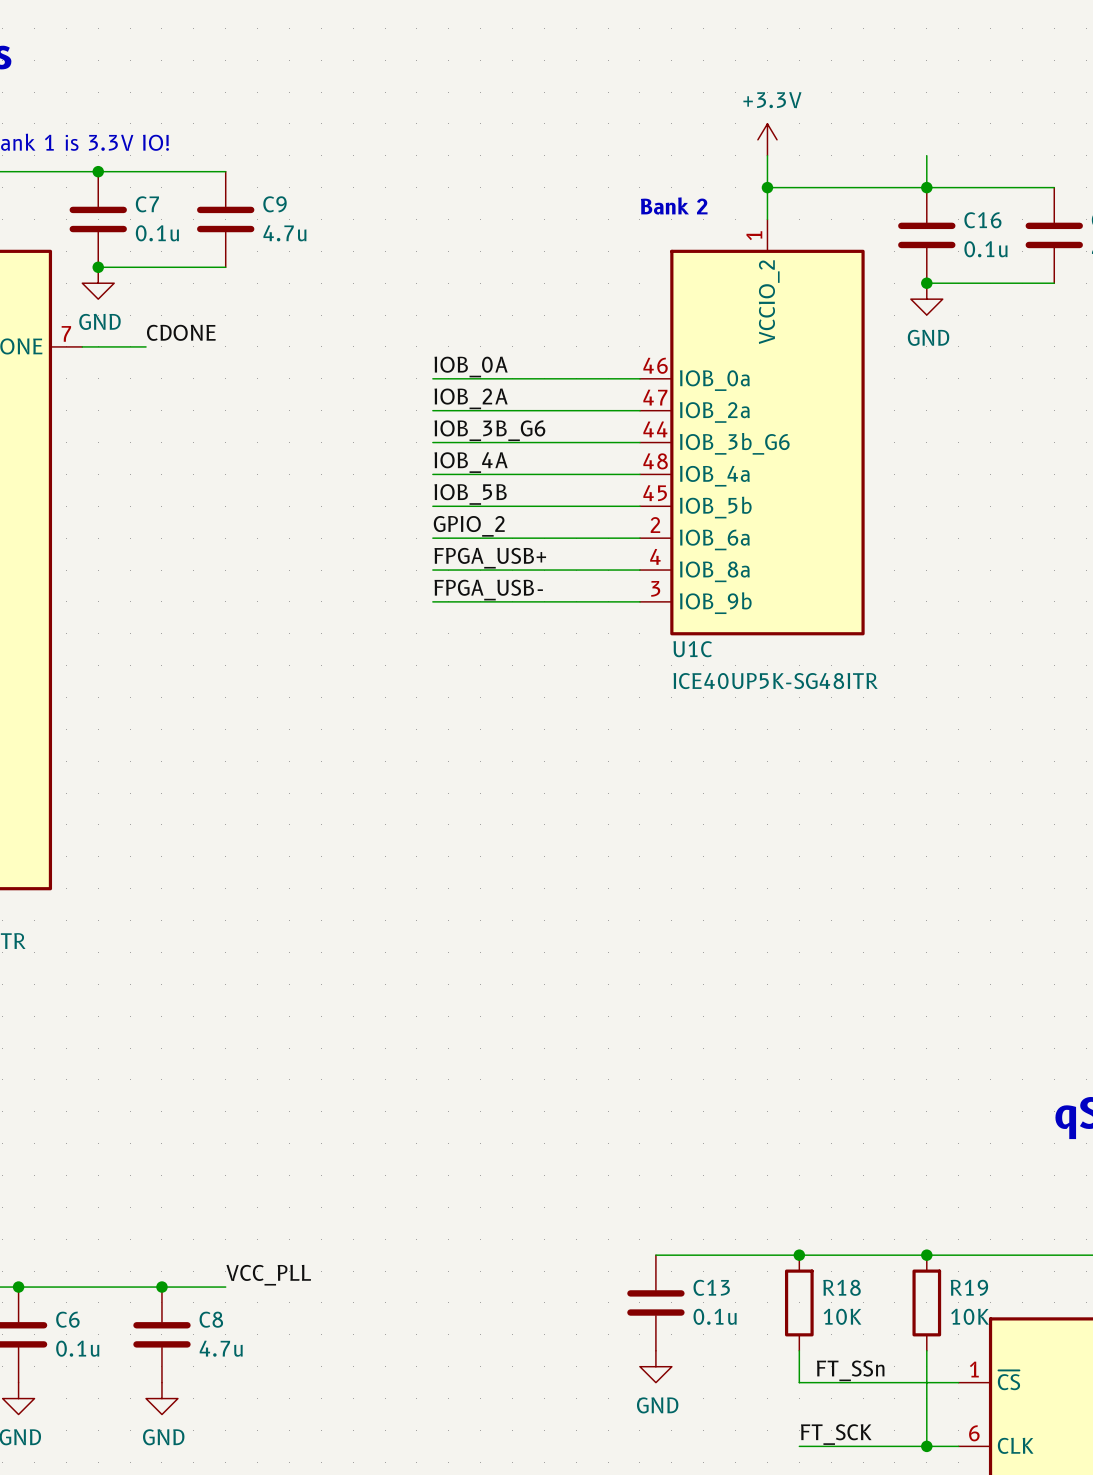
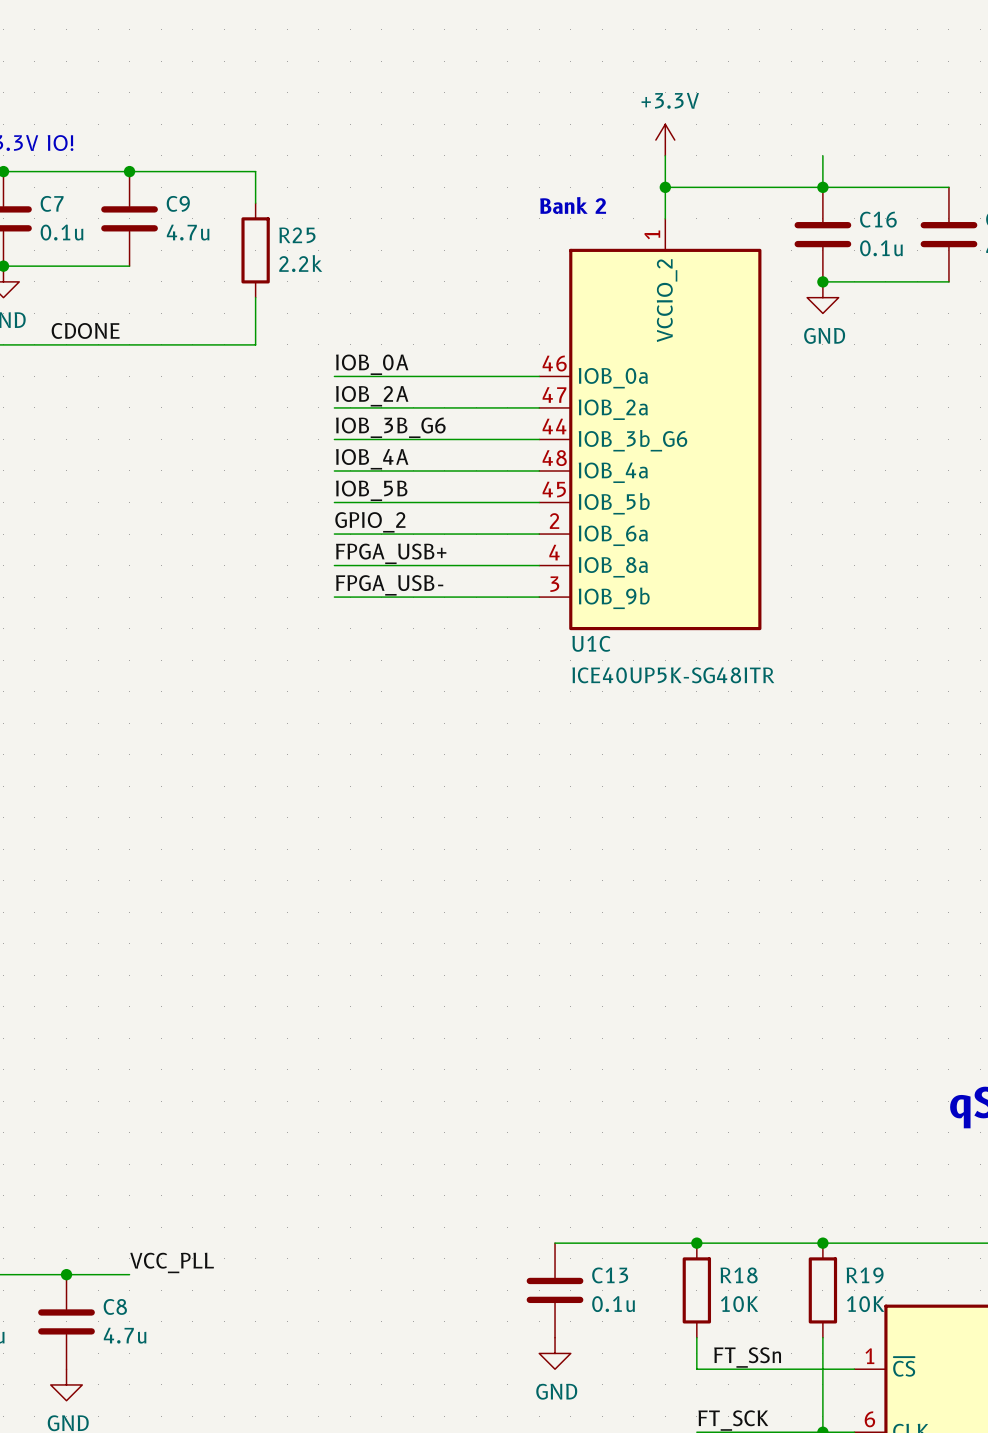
wire: none -> (129, 171) (255, 171) (255, 203)
junction: none -> (129, 171)
R25: none -> 2.2k (255, 250)
wire: none -> (255, 297) (255, 344) (50, 344)

